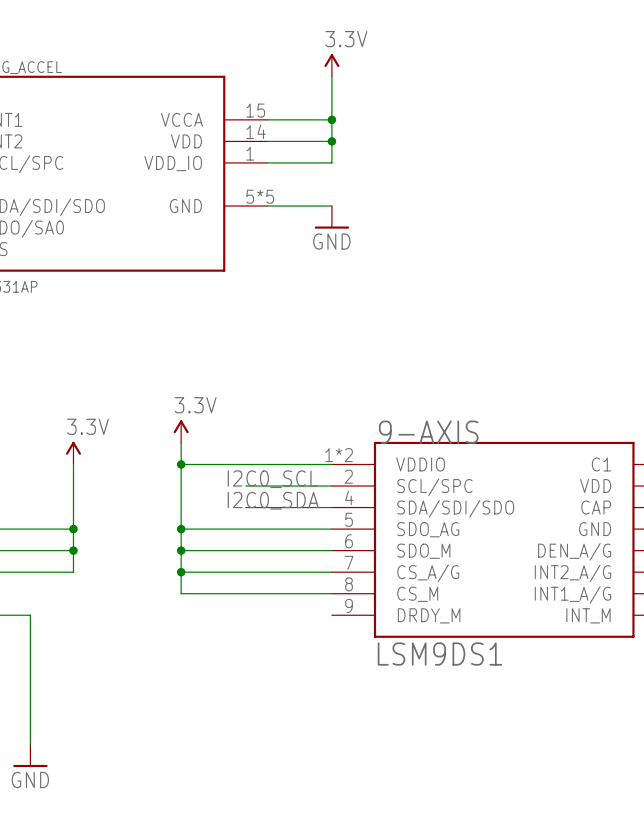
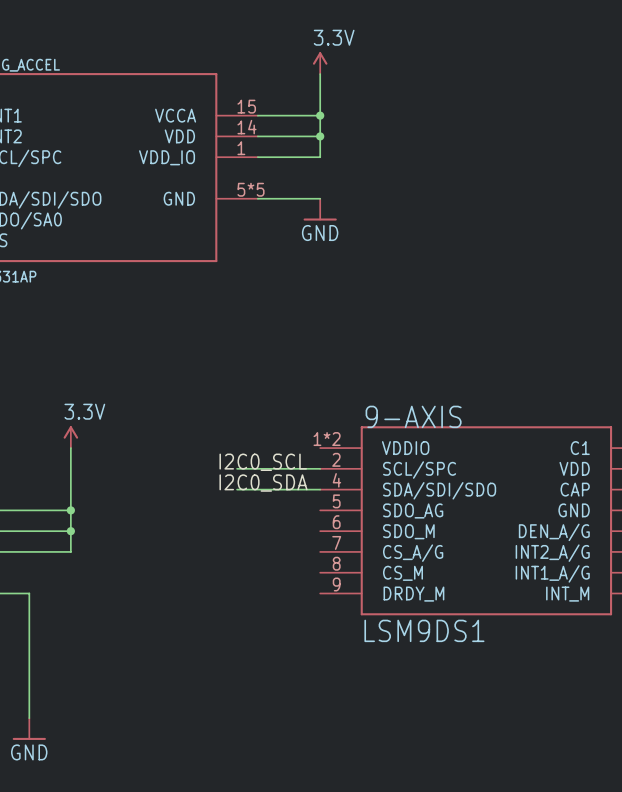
power symbol: 3.3V (181, 431) -> none
wire: (181, 442) (181, 593) (331, 593) -> none
wire: (181, 464) (331, 464) -> none
junction: (181, 464) -> none
wire: (181, 529) (331, 529) -> none
junction: (181, 529) -> none
wire: (181, 550) (331, 550) -> none
junction: (181, 550) -> none
wire: (181, 572) (331, 572) -> none
junction: (181, 572) -> none

